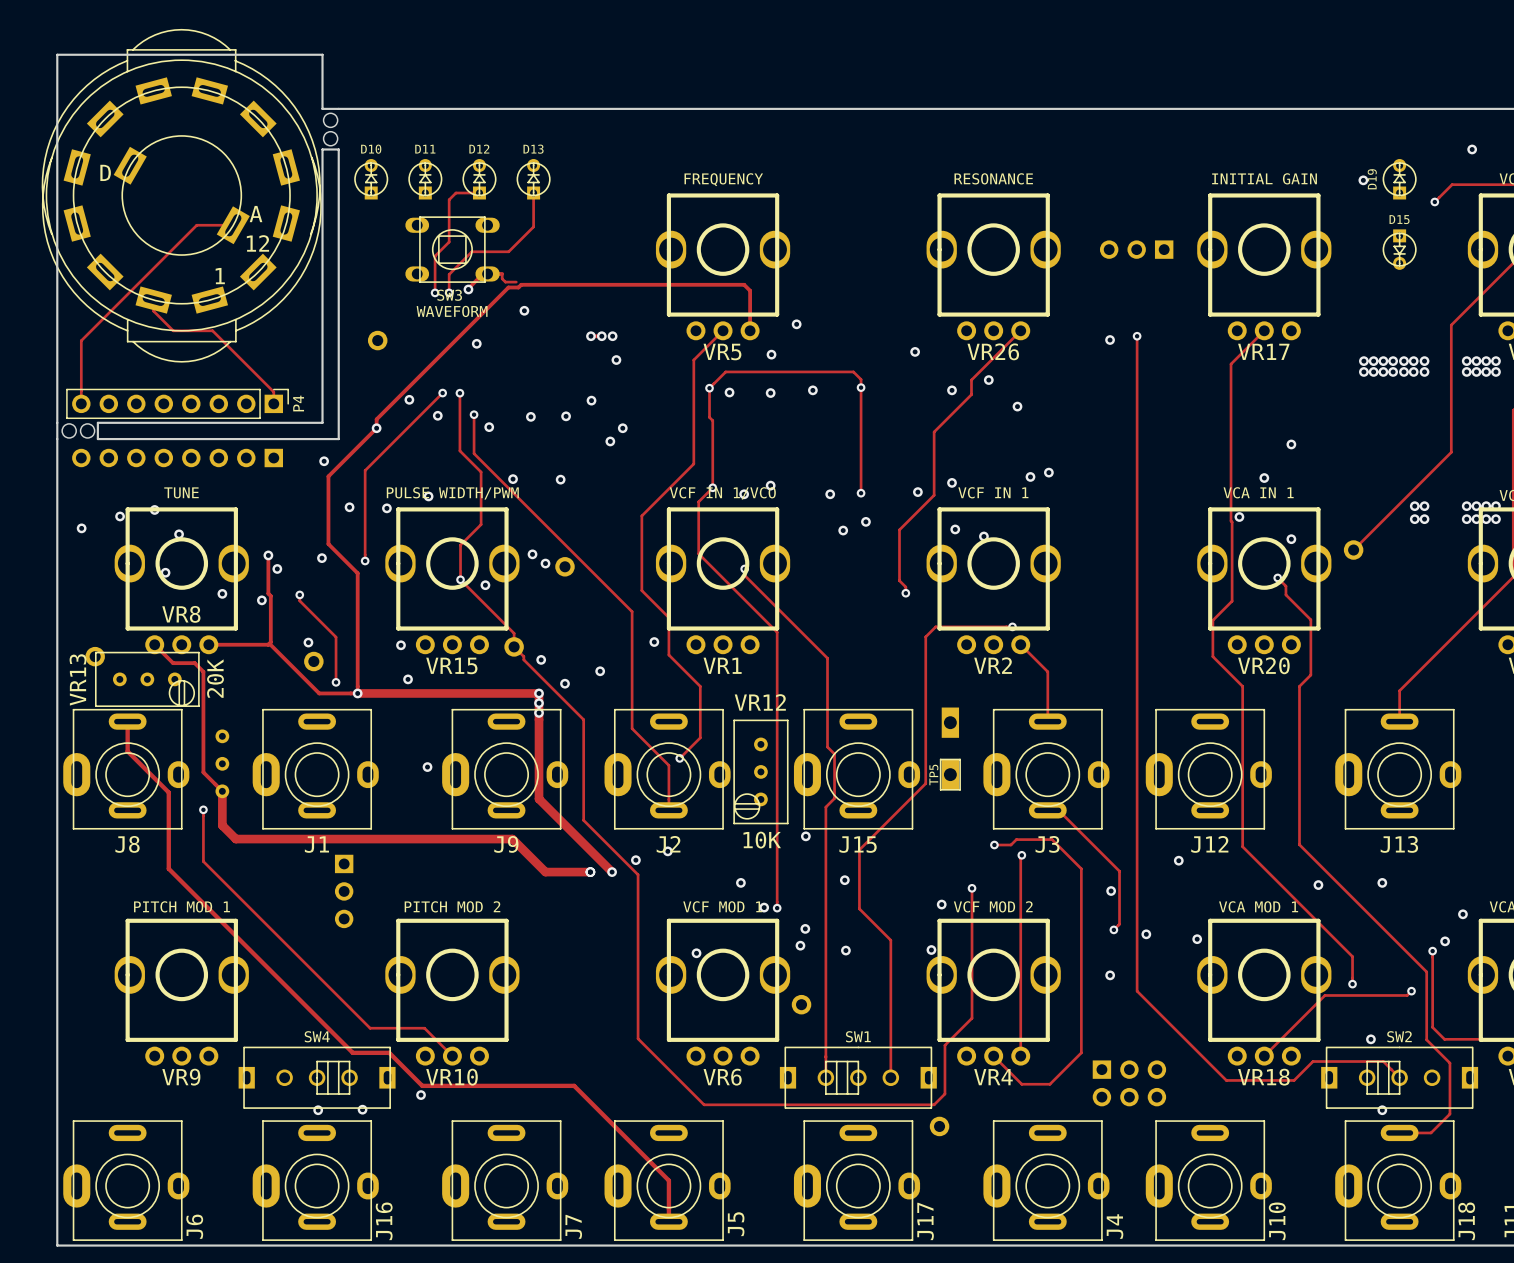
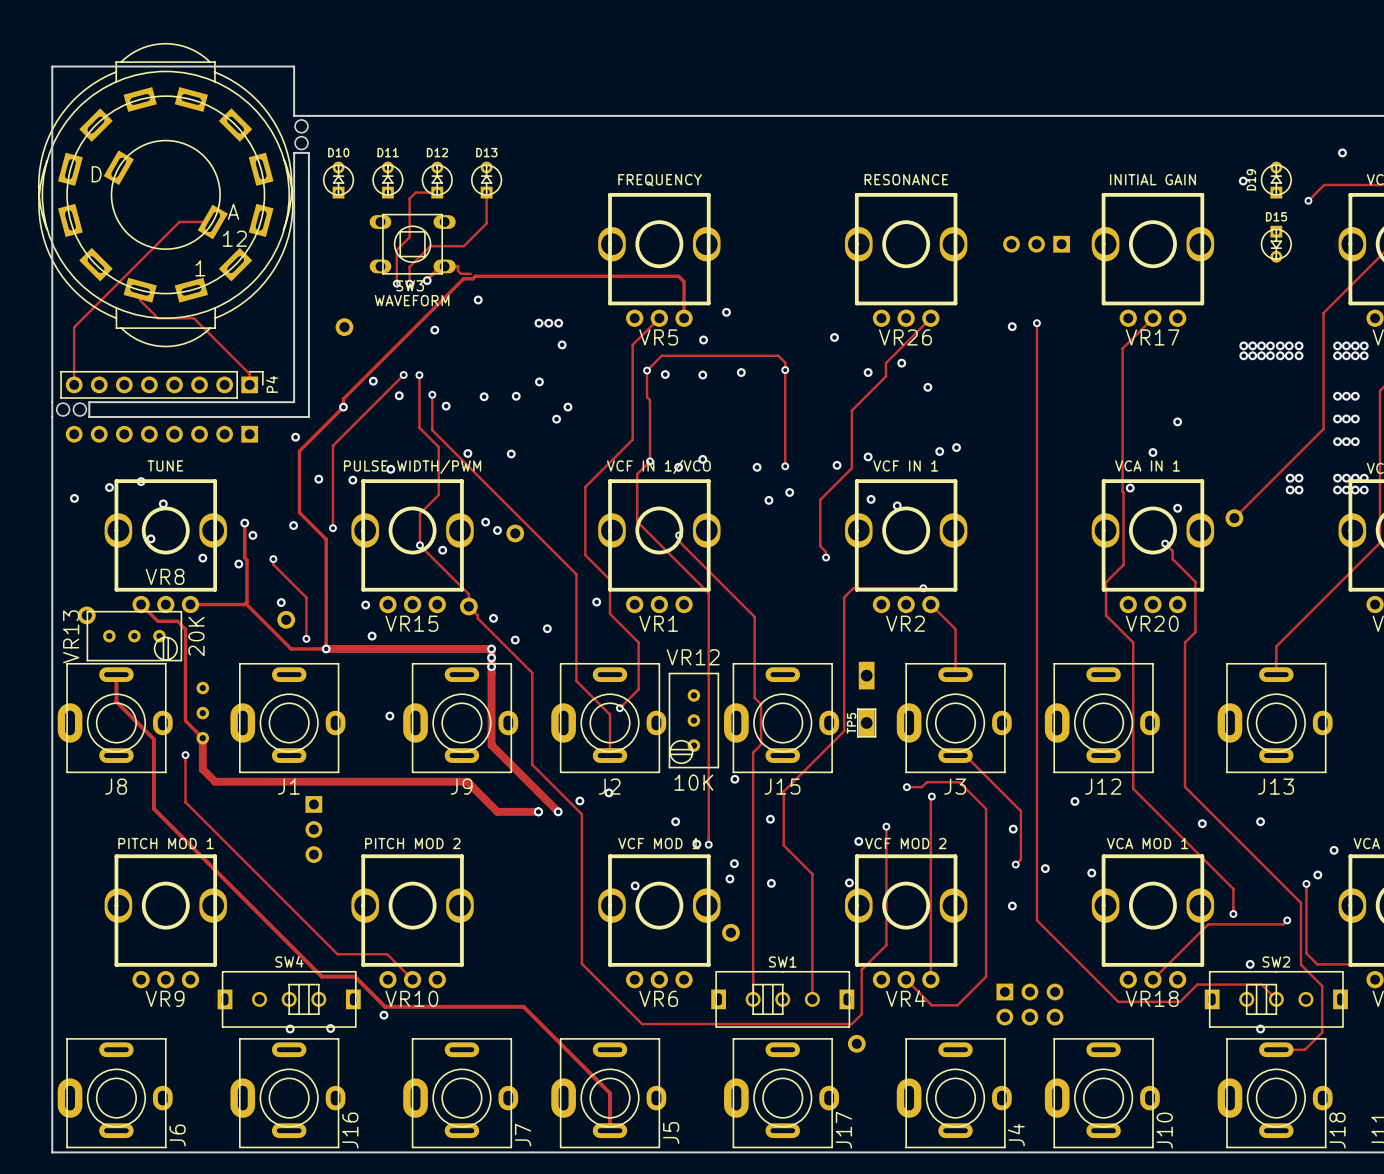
via: none -> (1337, 396)
via: none -> (1346, 396)
via: none -> (1355, 396)
via: none -> (1337, 418)
via: none -> (1346, 418)
via: none -> (1355, 418)
via: none -> (1337, 441)
via: none -> (1346, 441)
via: none -> (1355, 441)

